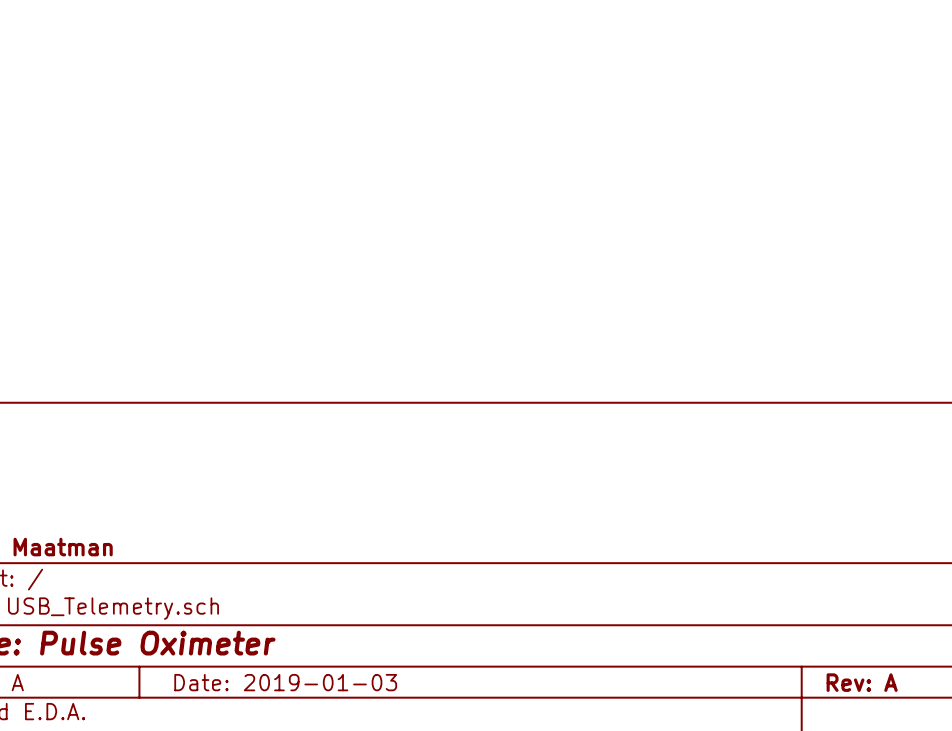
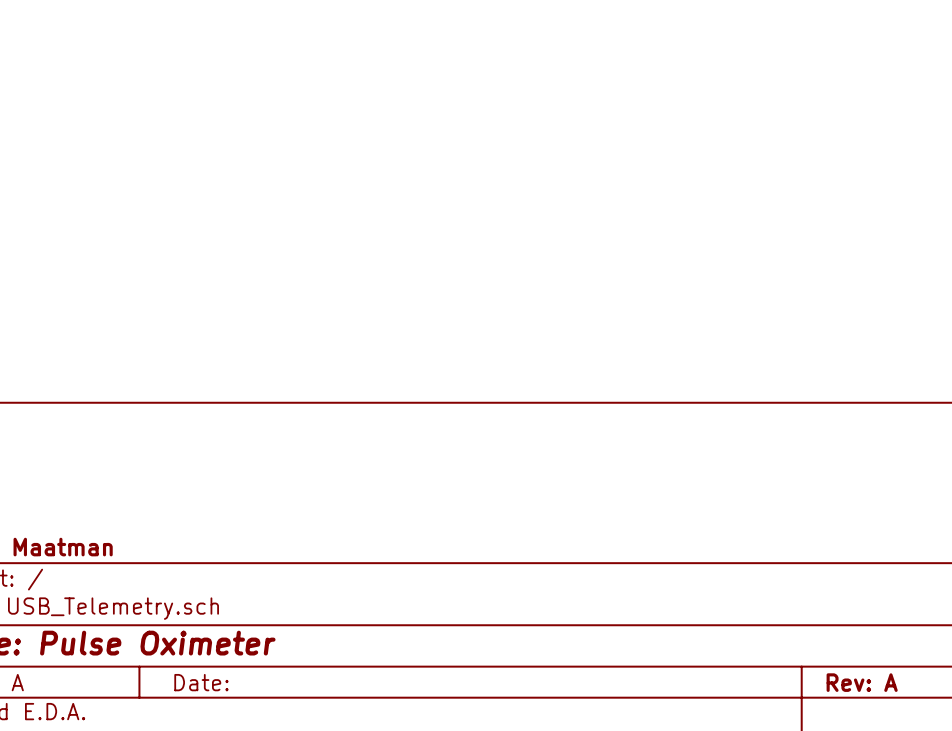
title block: Date: 2019-01-03 (285, 682) -> Date: (201, 682)

